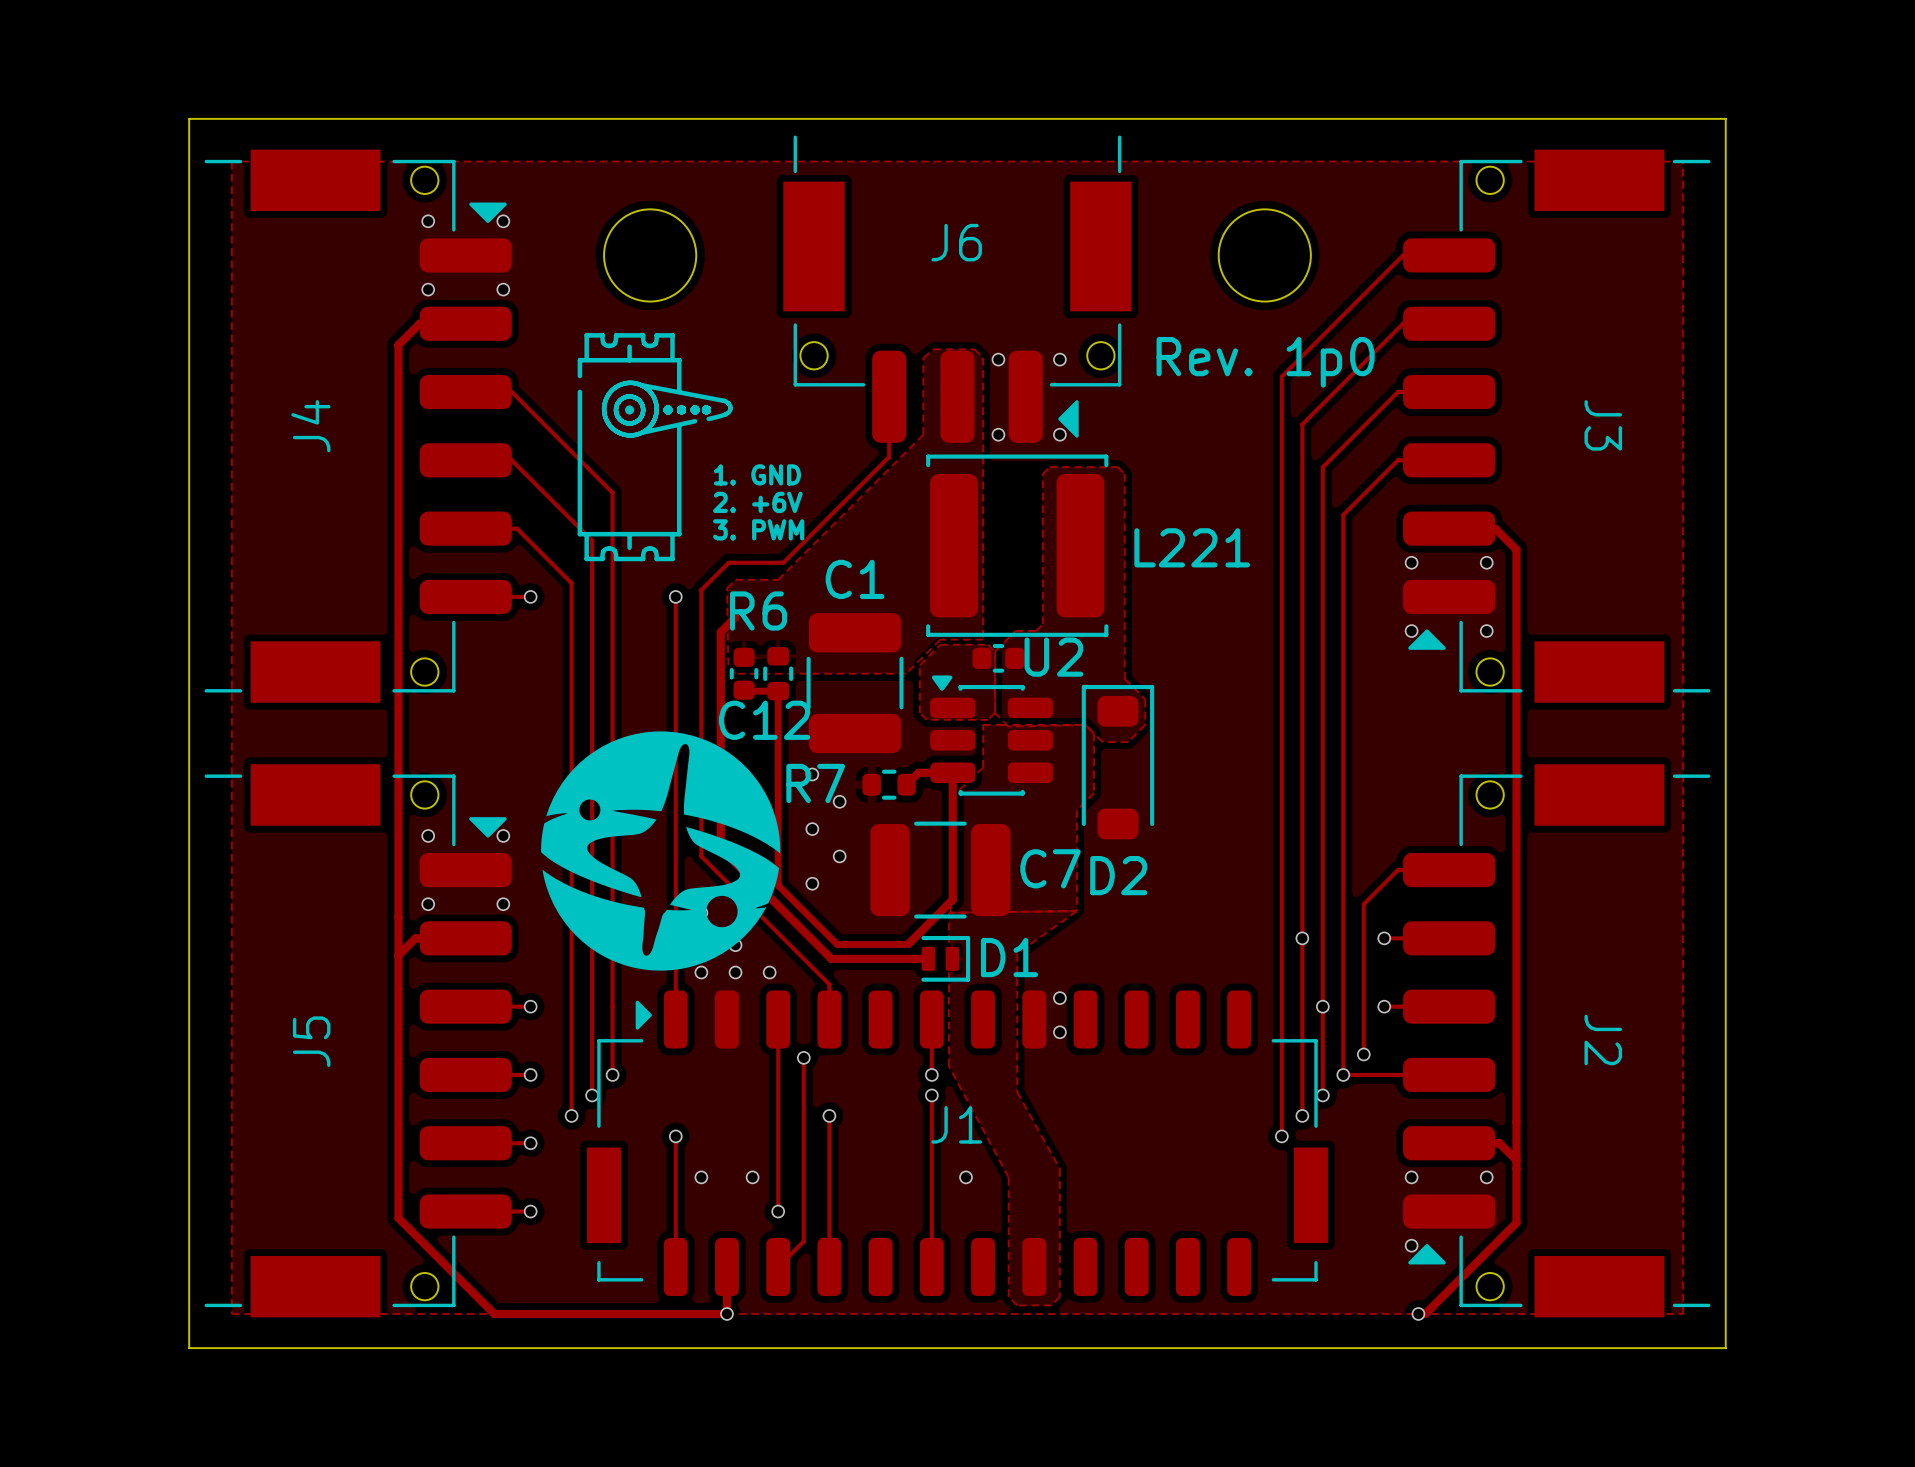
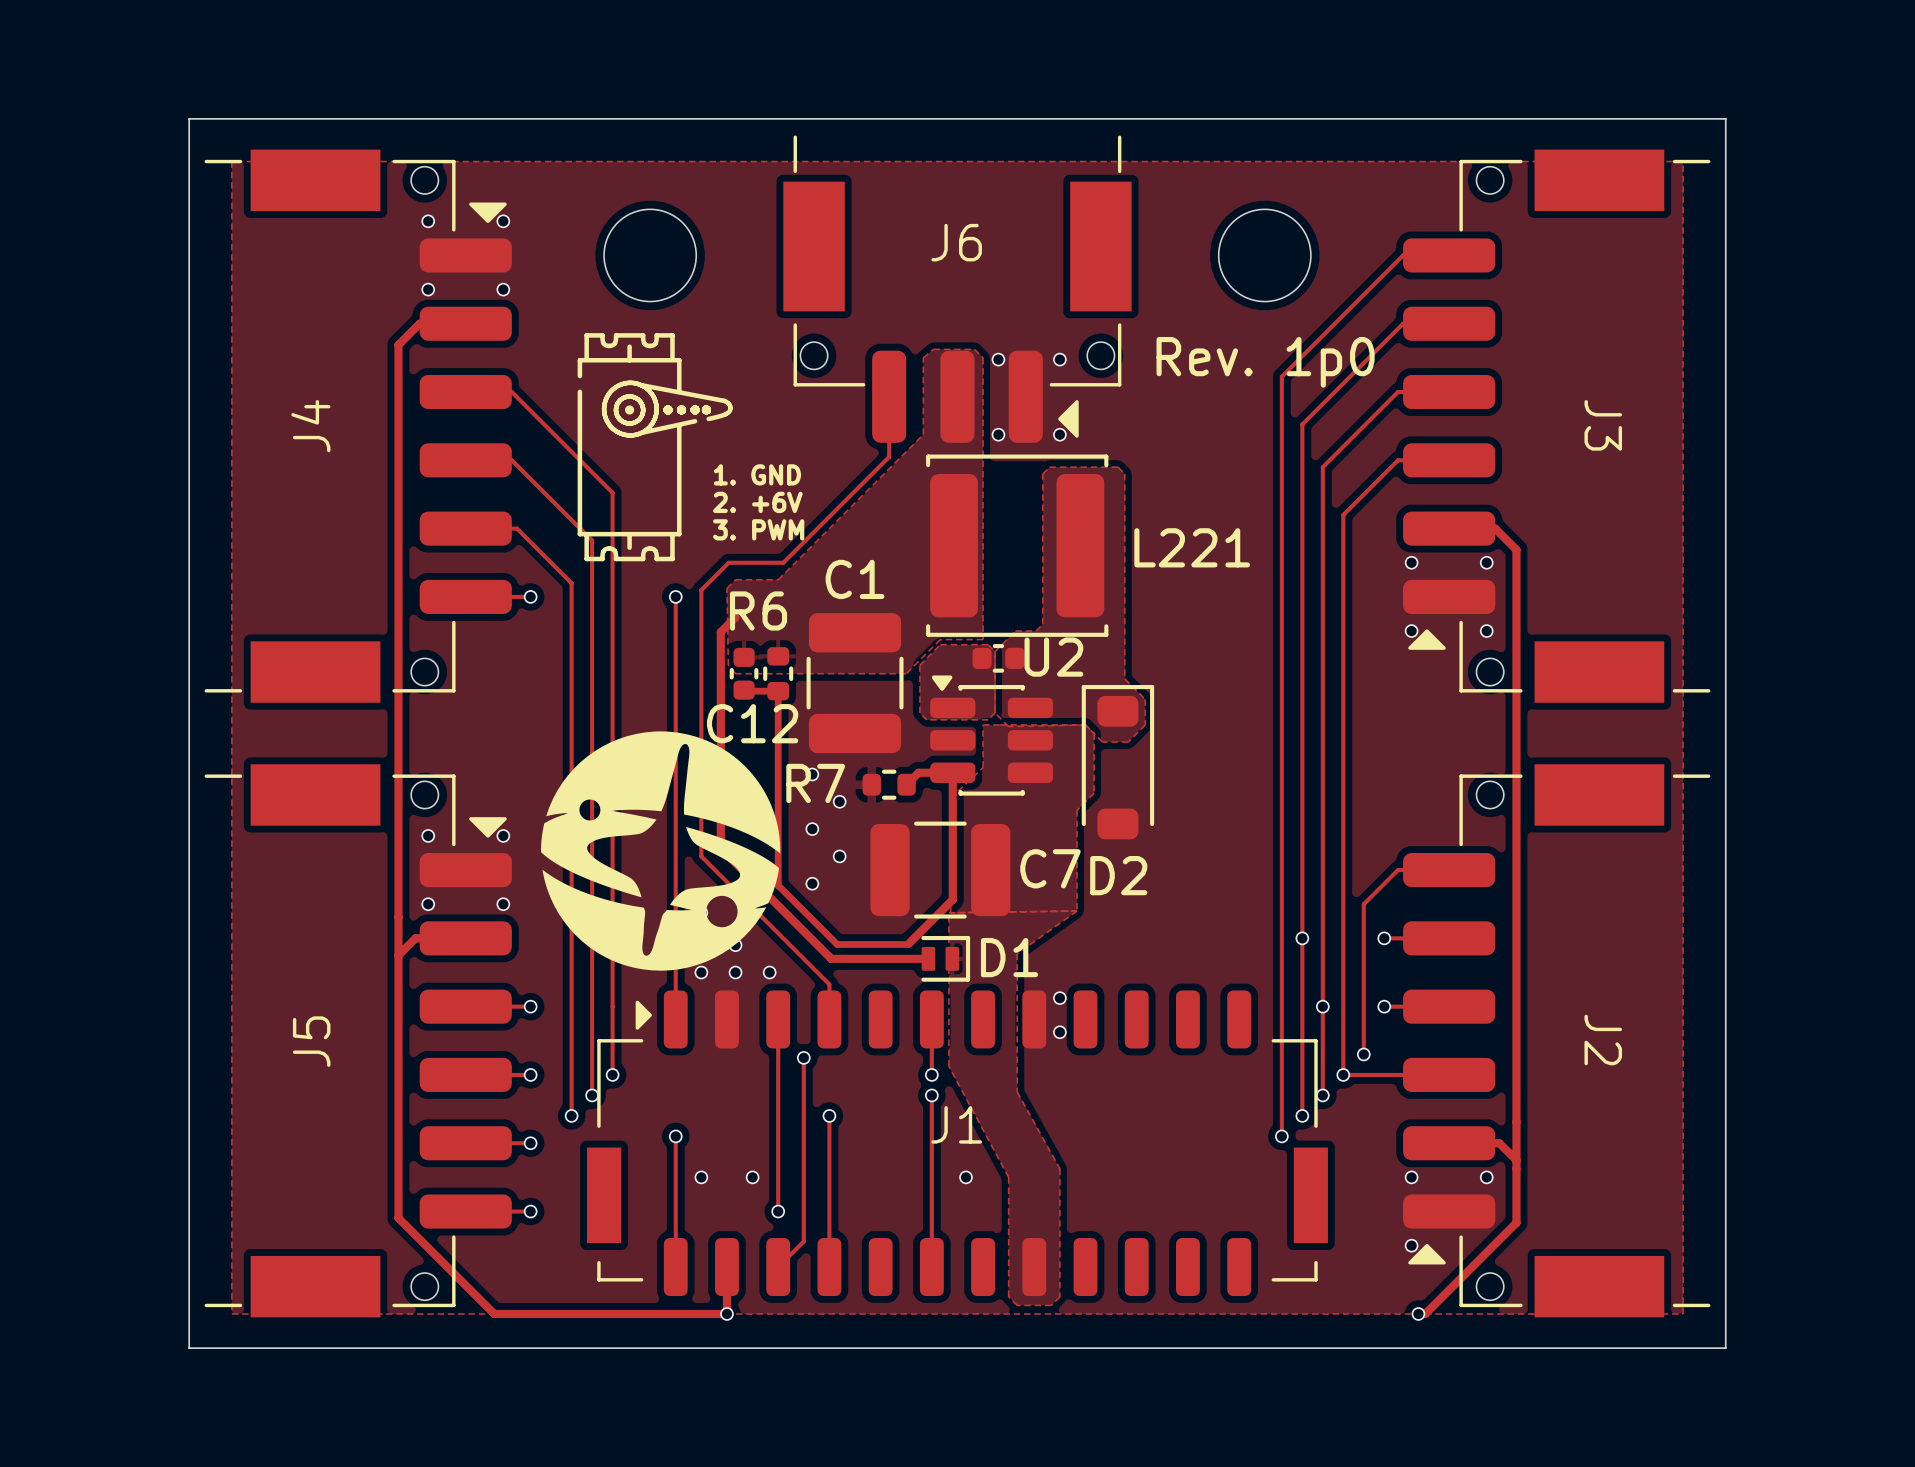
C12 name position: C12 (764, 720) -> C12 (752, 723)

